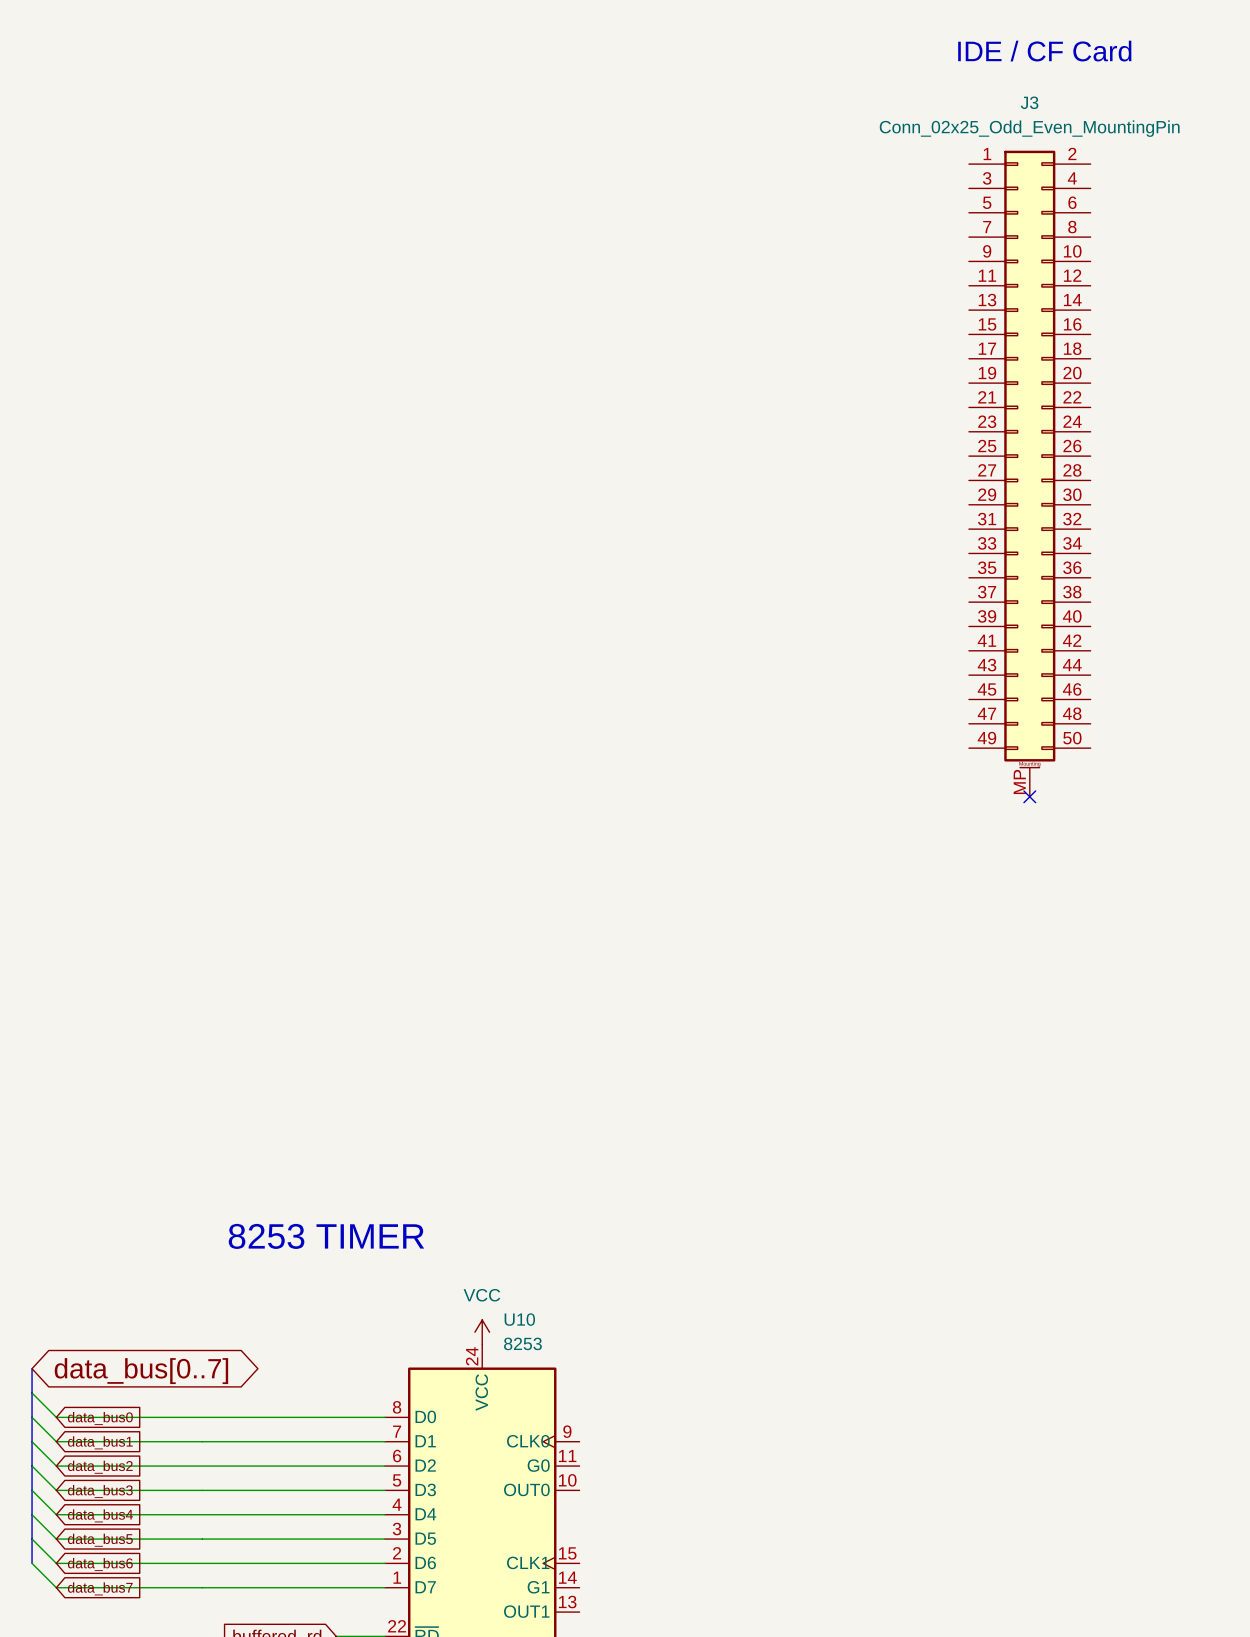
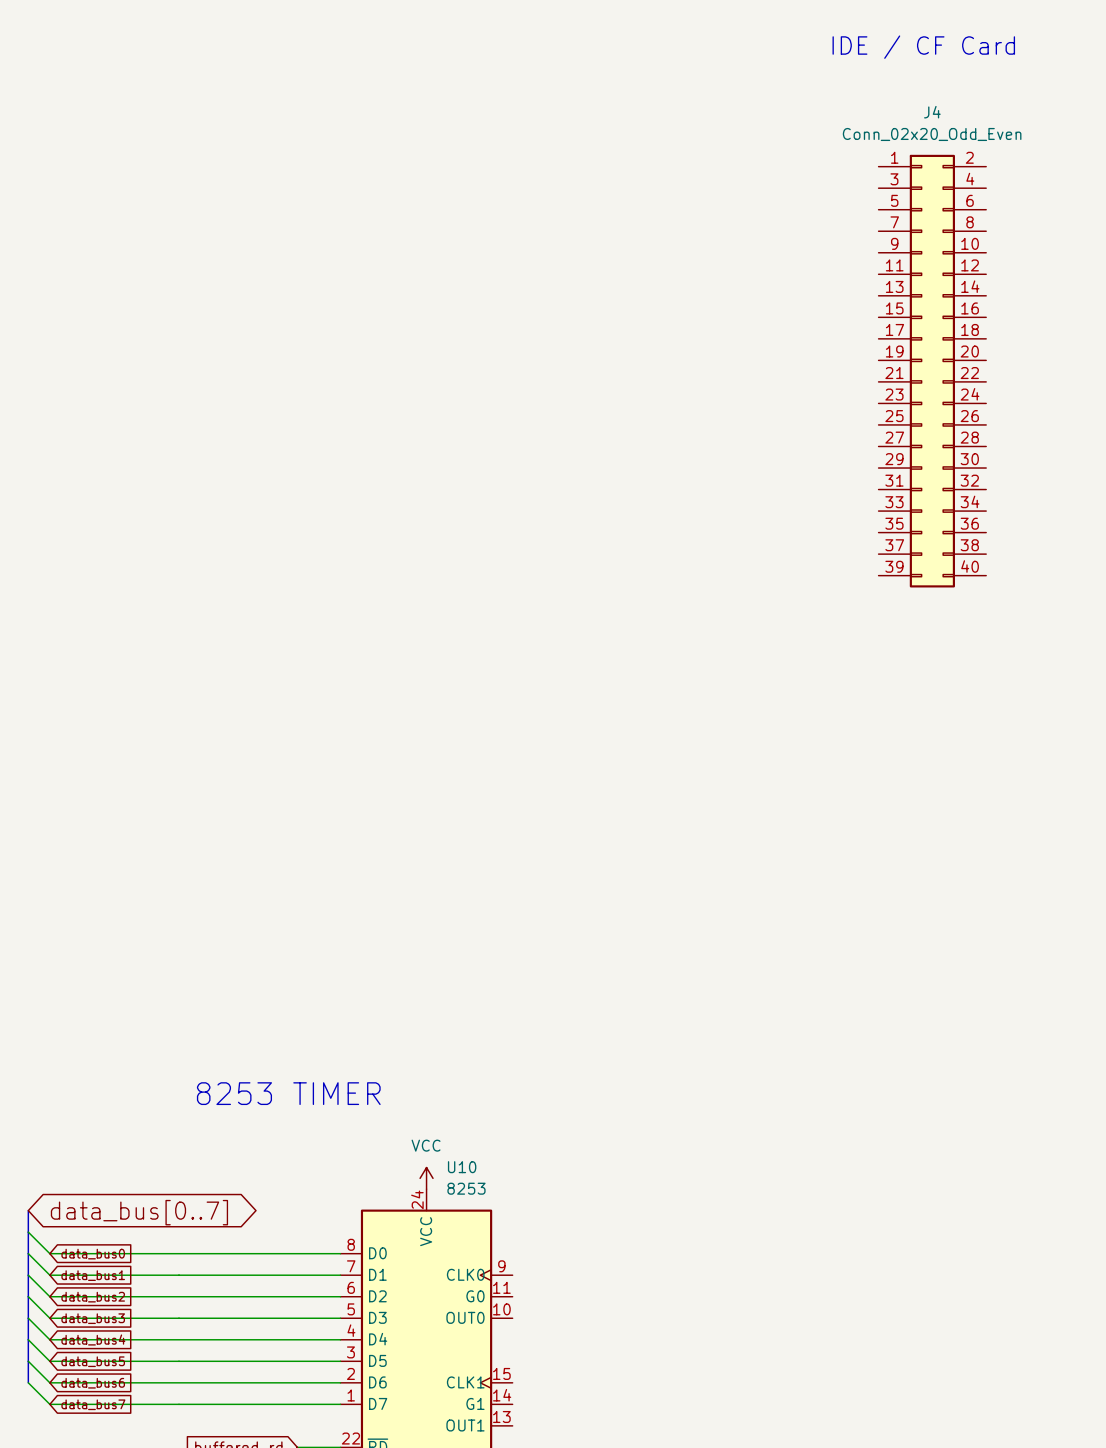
J4: none -> Conn_02x20_Odd_Even (932, 371)
J3: Conn_02x25_Odd_Even_MountingPin (1029, 473) -> none
no-connect mark: (1029, 796) -> none

